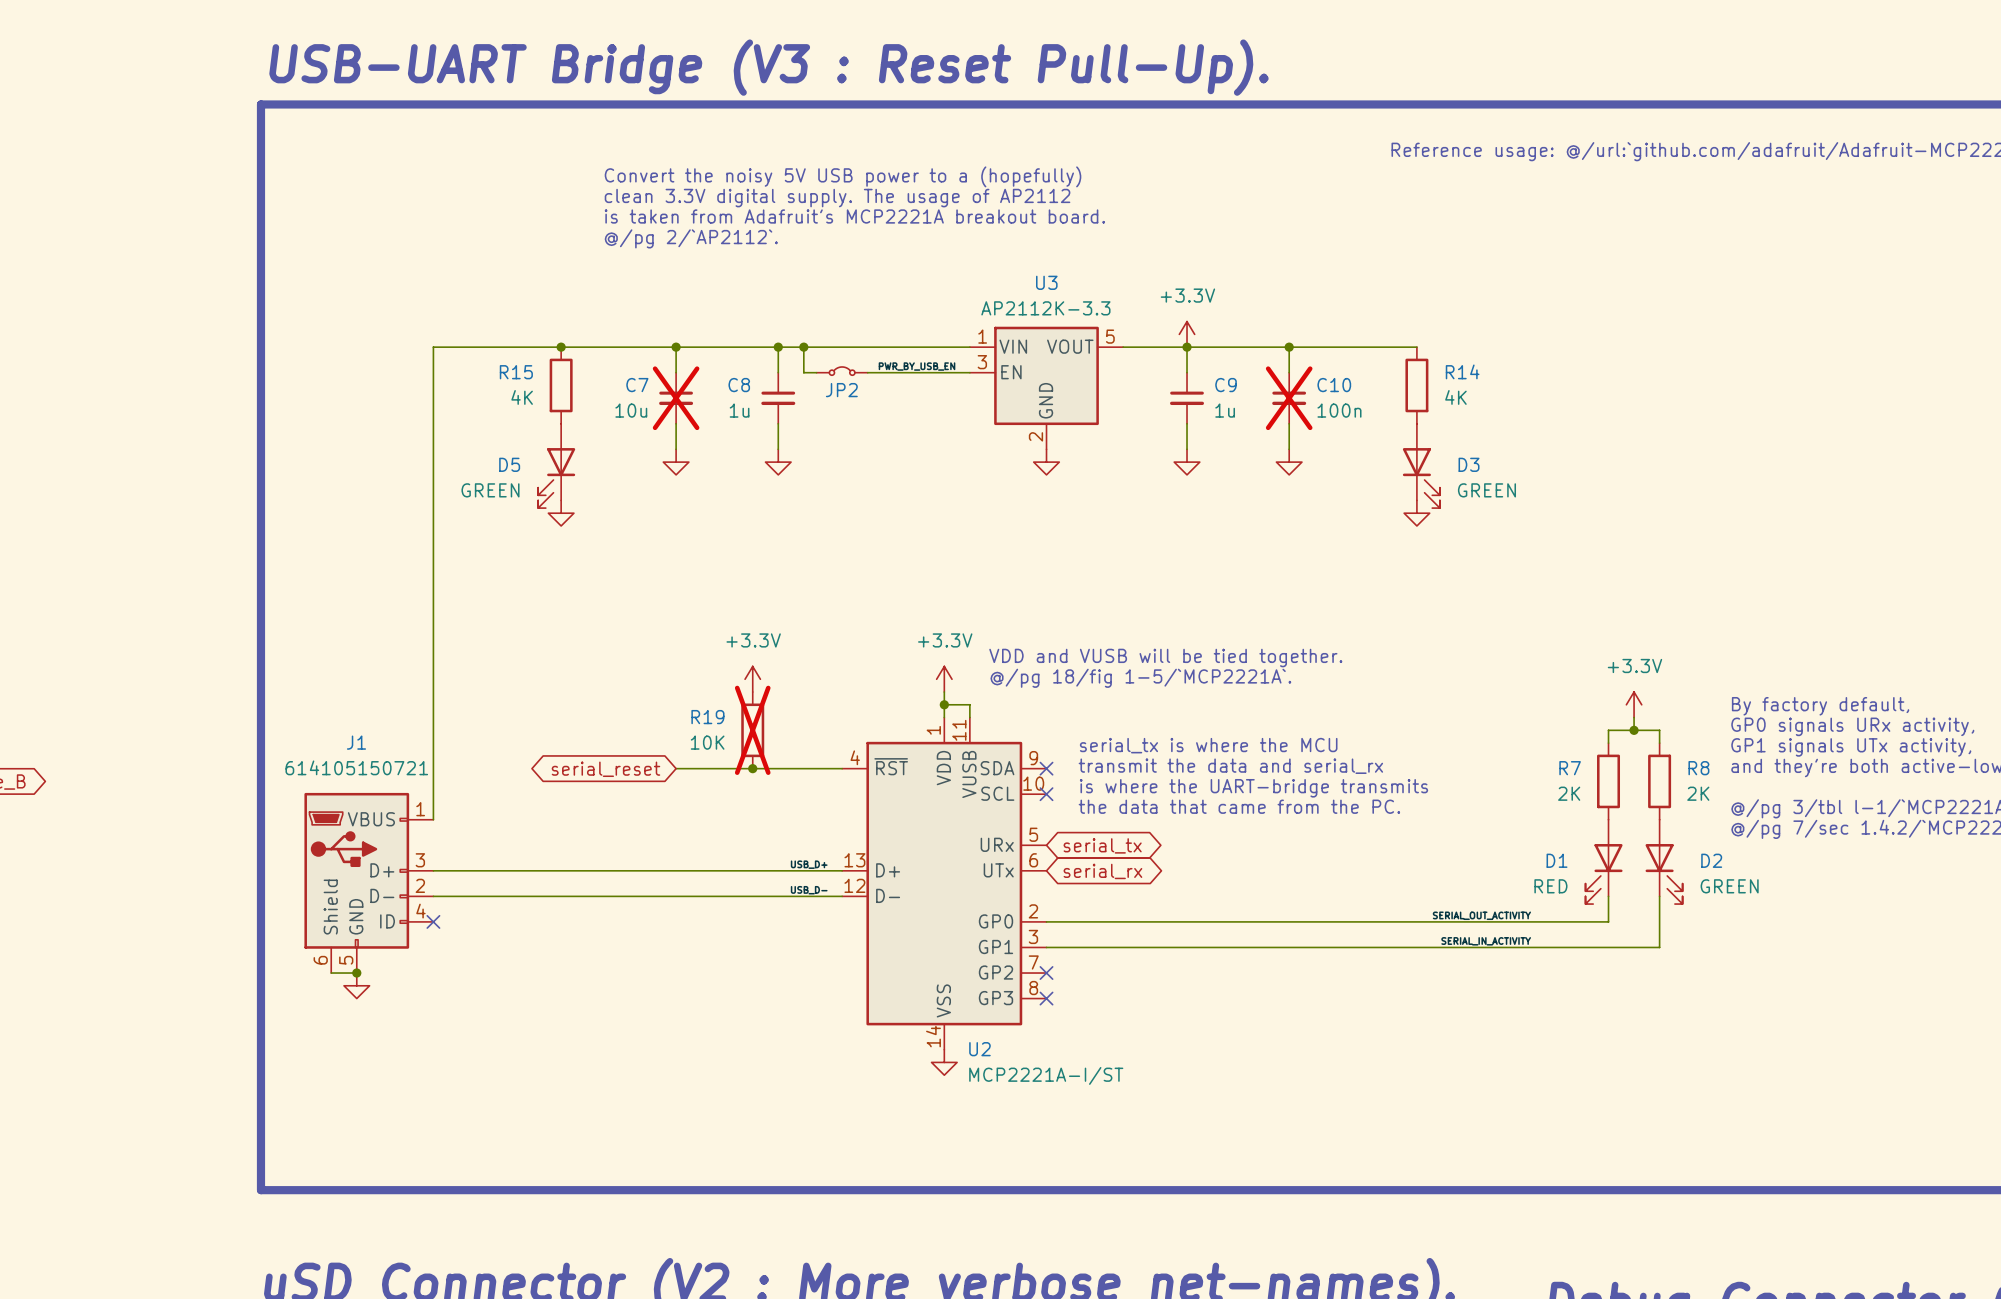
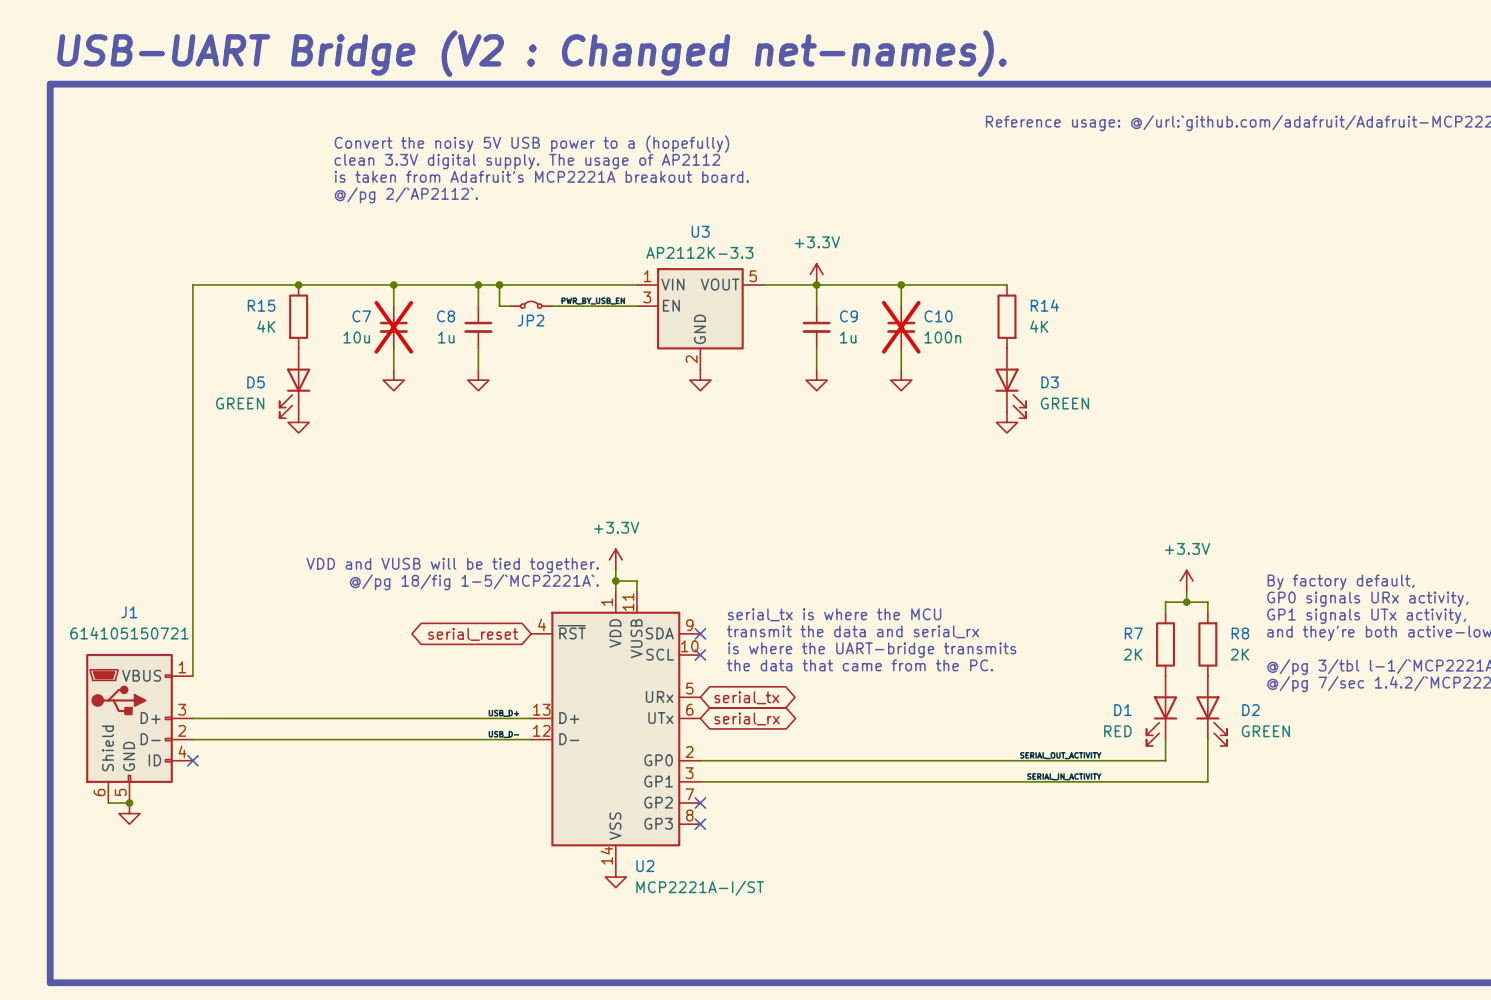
text: USB-UART Bridge (V3 : Reset Pull-Up). (768, 67) -> USB-UART Bridge (V2 : Changed net-names). (531, 53)
text position: VDD and VUSB will be tied together. (1165, 658) -> VDD and VUSB will be tied together. (452, 565)
text position: @/pg 18/fig 1-5/`MCP2221A`. (1140, 678) -> @/pg 18/fig 1-5/`MCP2221A`. (474, 582)
power symbol: +3.3V (752, 679) -> none
R19: 10K (752, 730) -> none
wire: (676, 768) (842, 768) -> none
junction: (752, 768) -> none
global label position: serial_reset (605, 769) -> serial_reset (473, 634)

